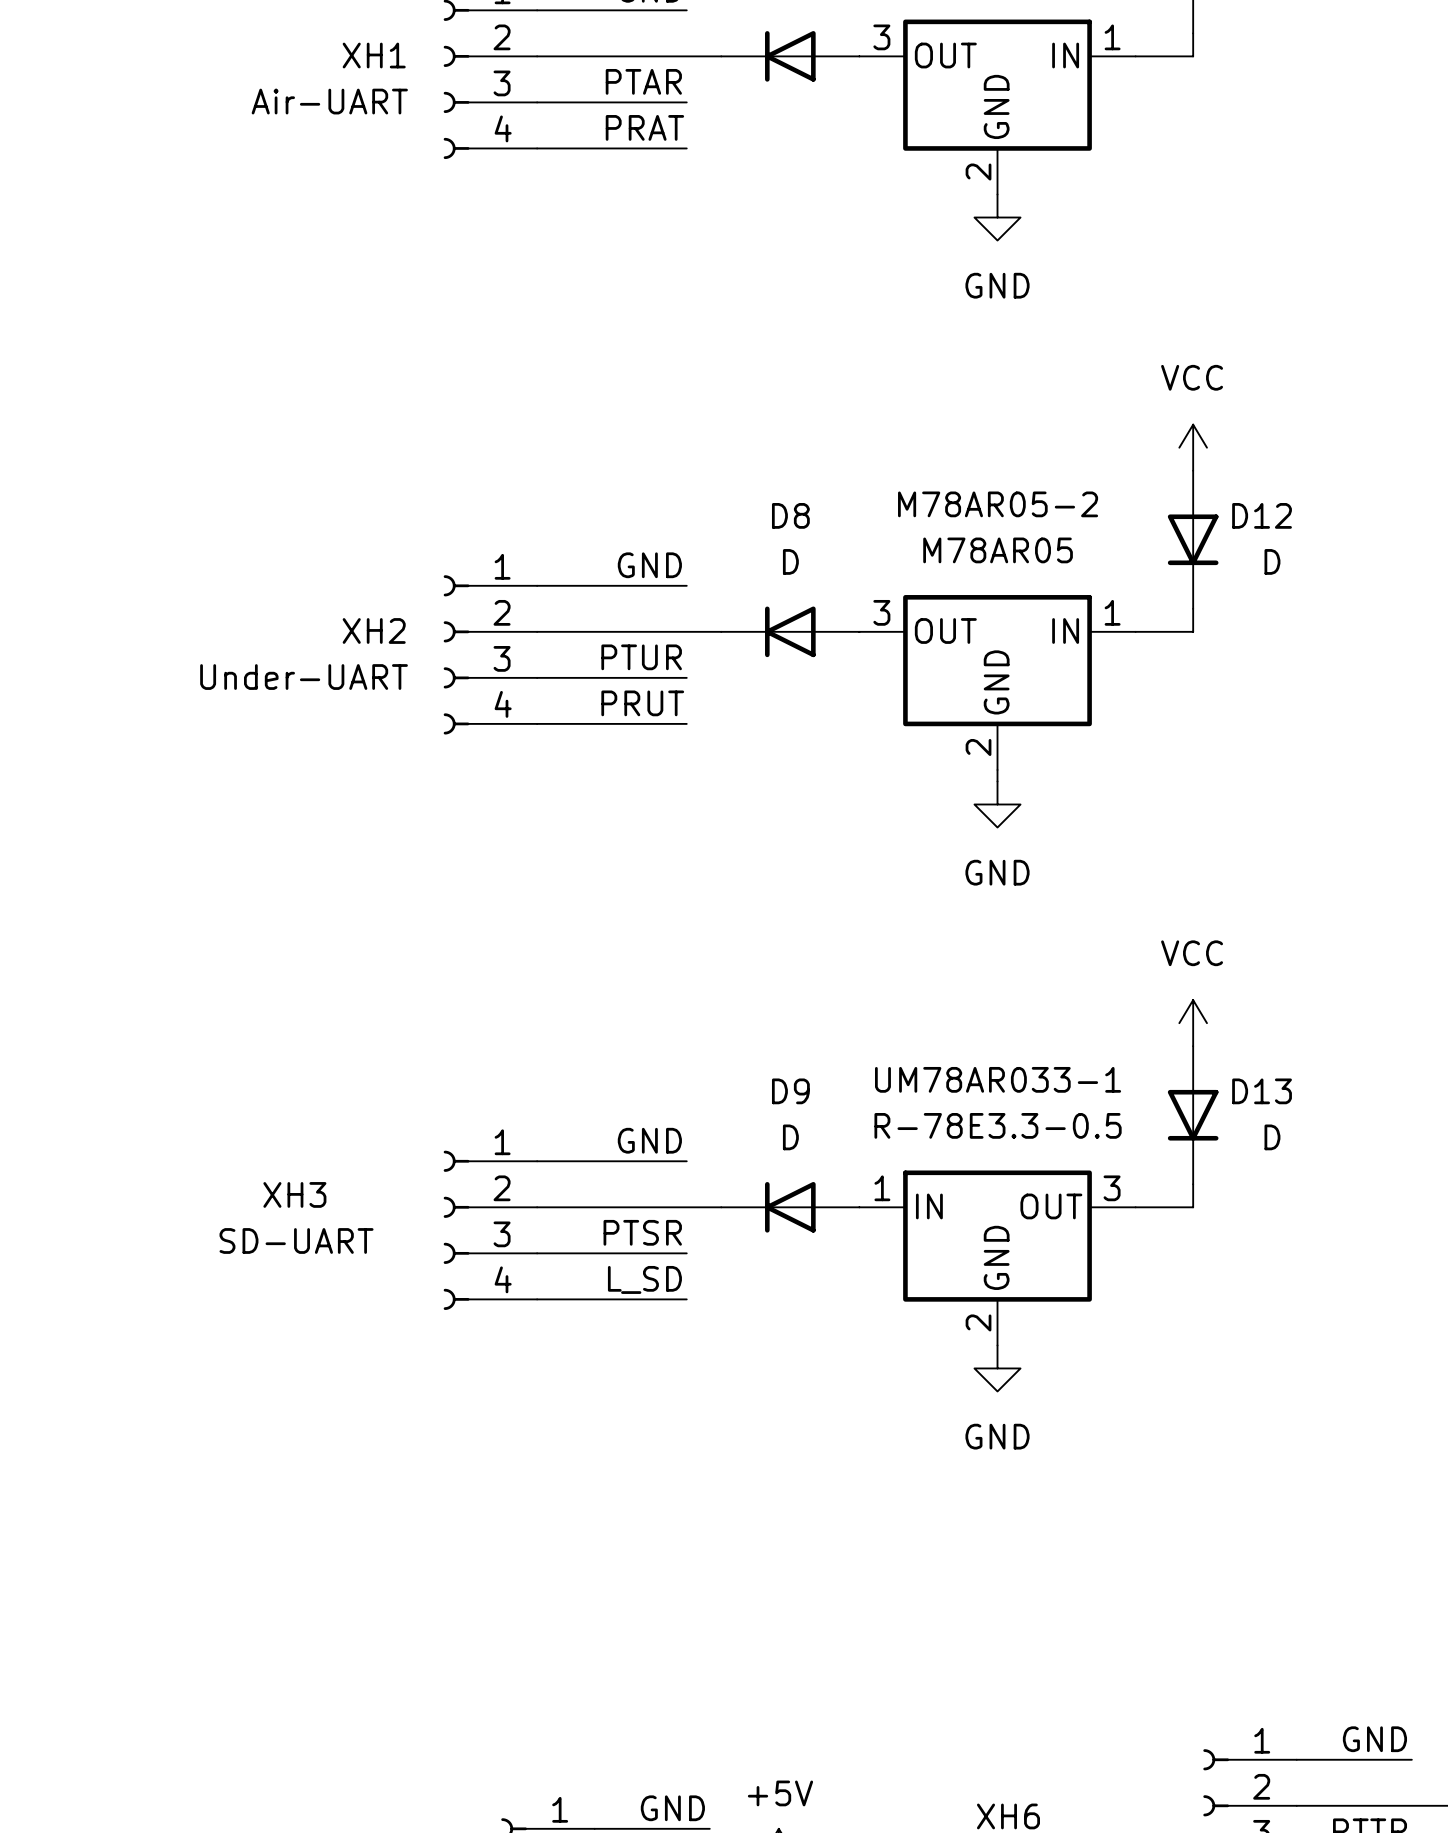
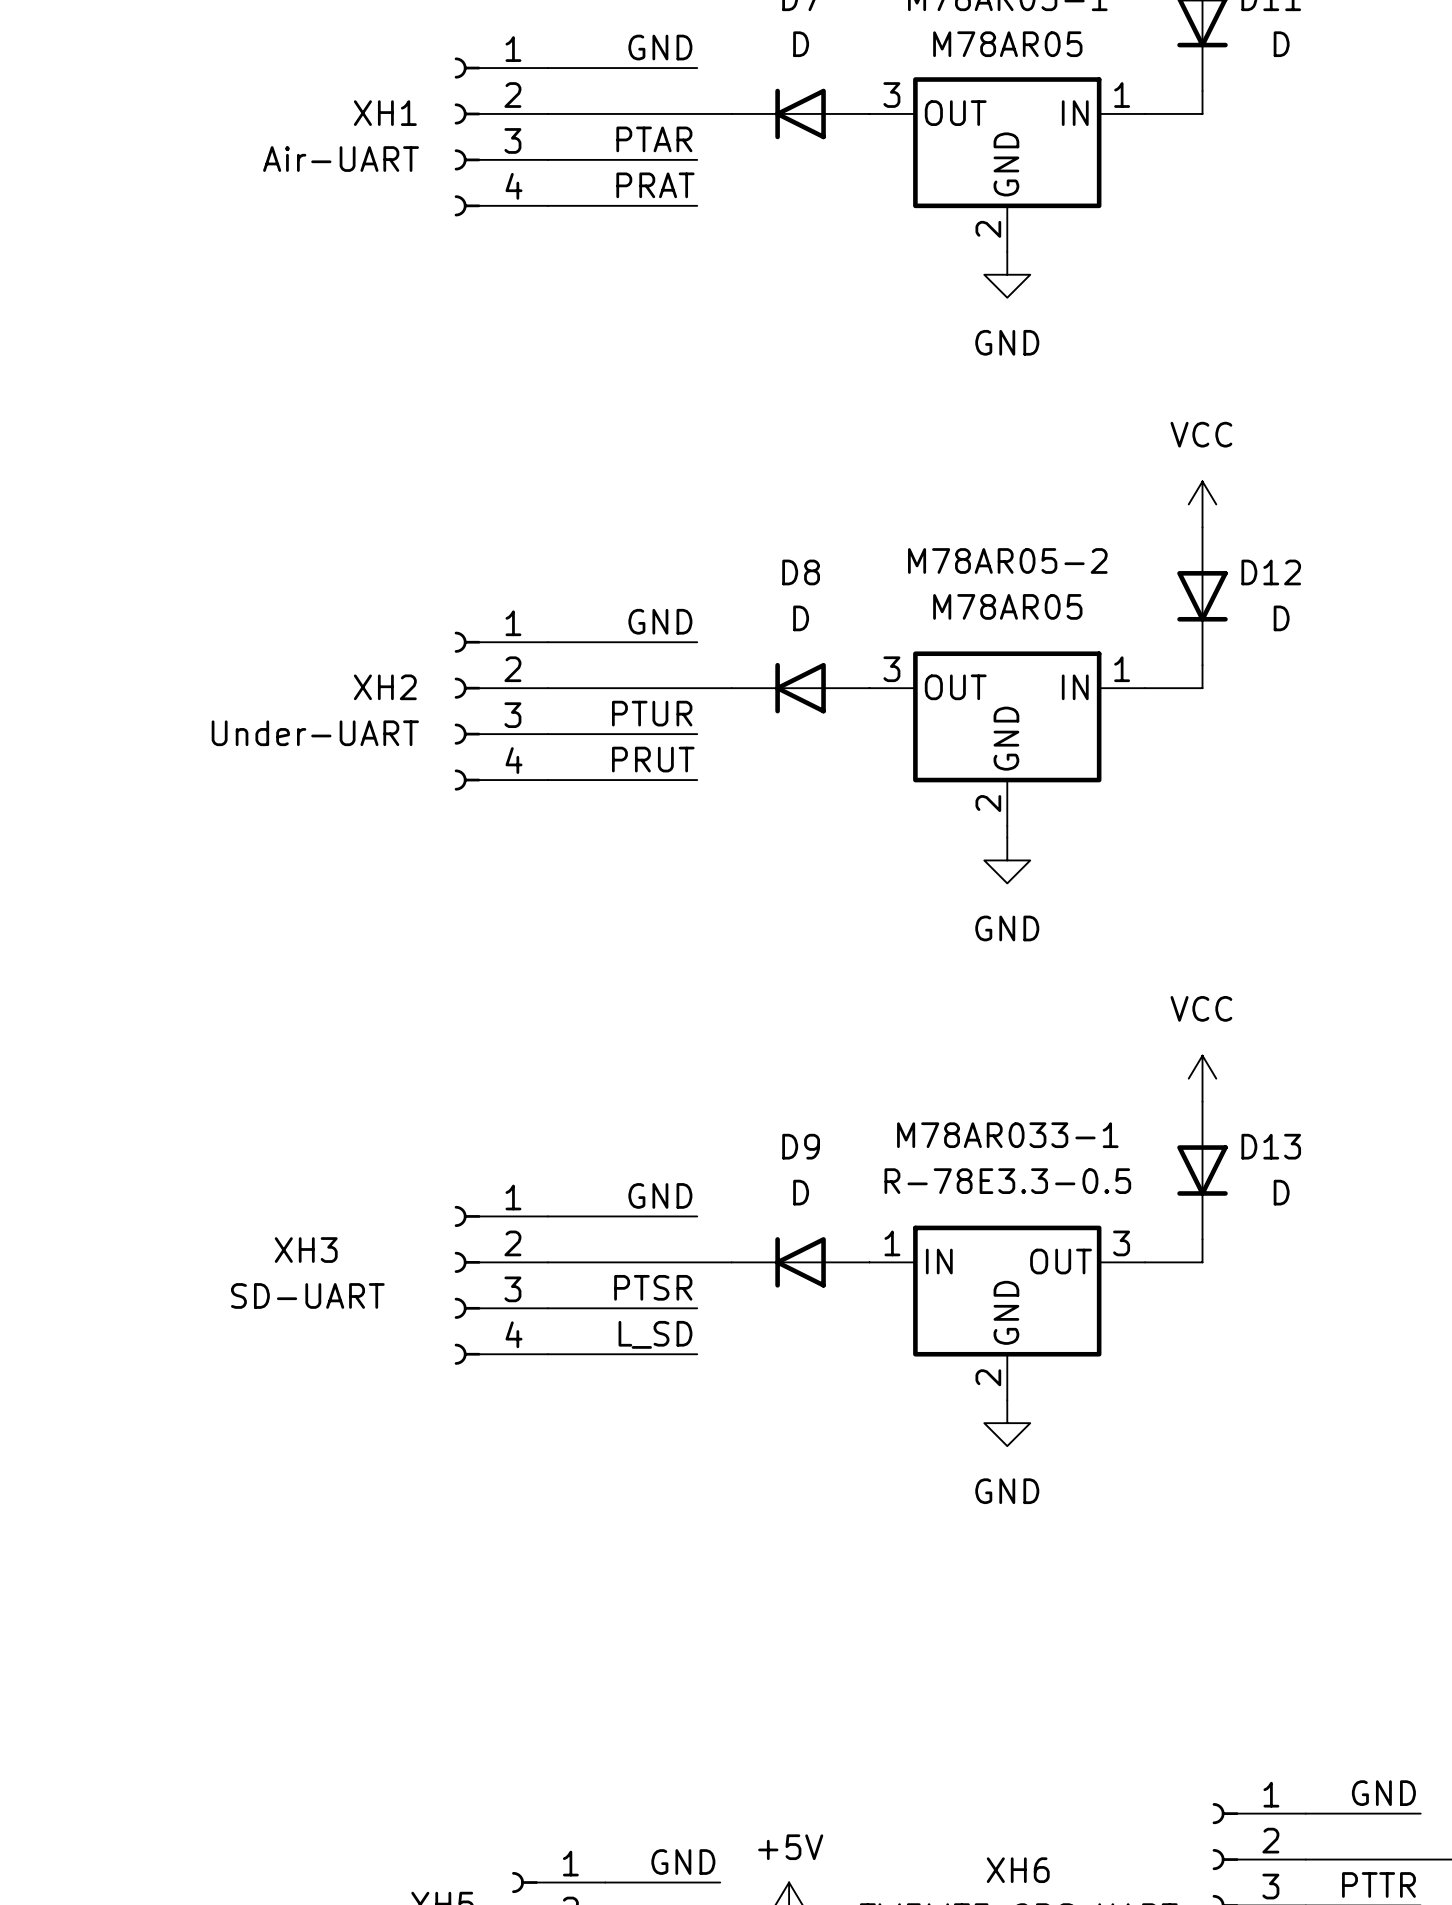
UM78AR033-1 name: UM78AR033-1 (998, 1079) -> M78AR033-1 (1007, 1135)

